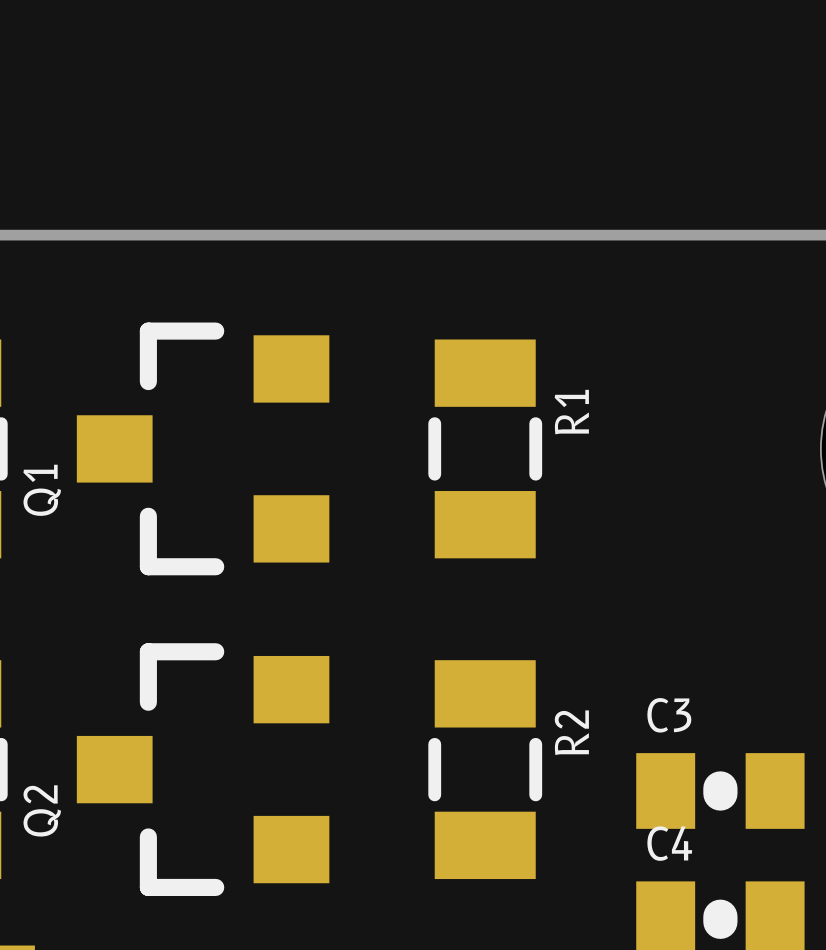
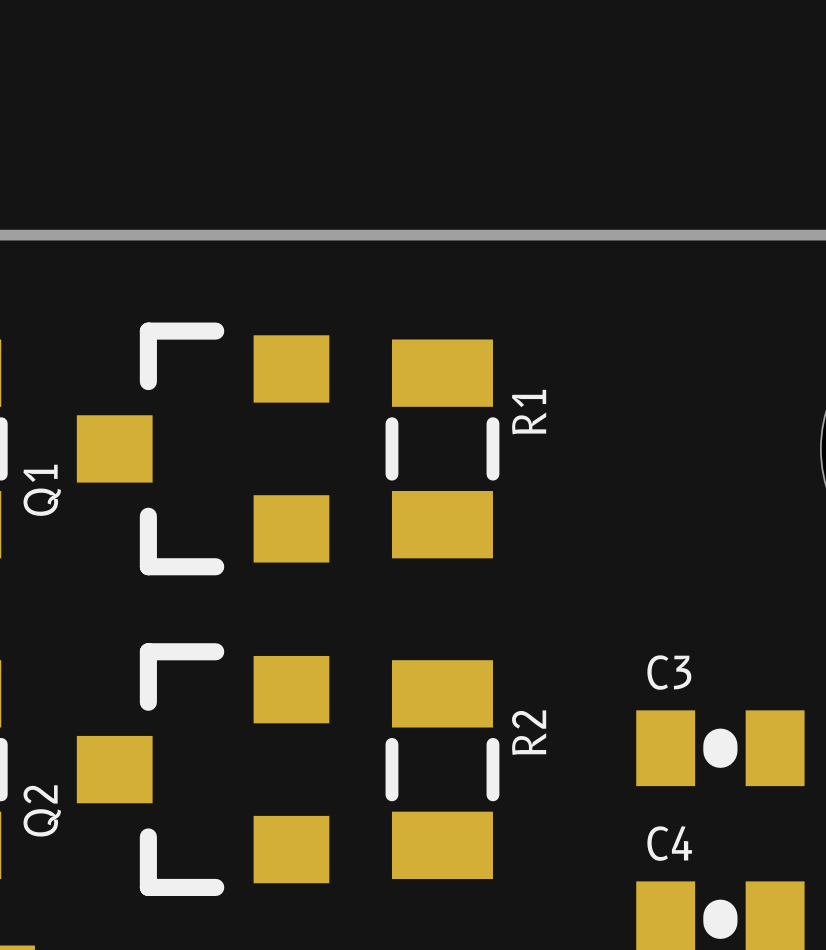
R1 position: (485, 448) -> (442, 448)
R2 position: (485, 769) -> (442, 769)
C3 position: (720, 790) -> (720, 748)

